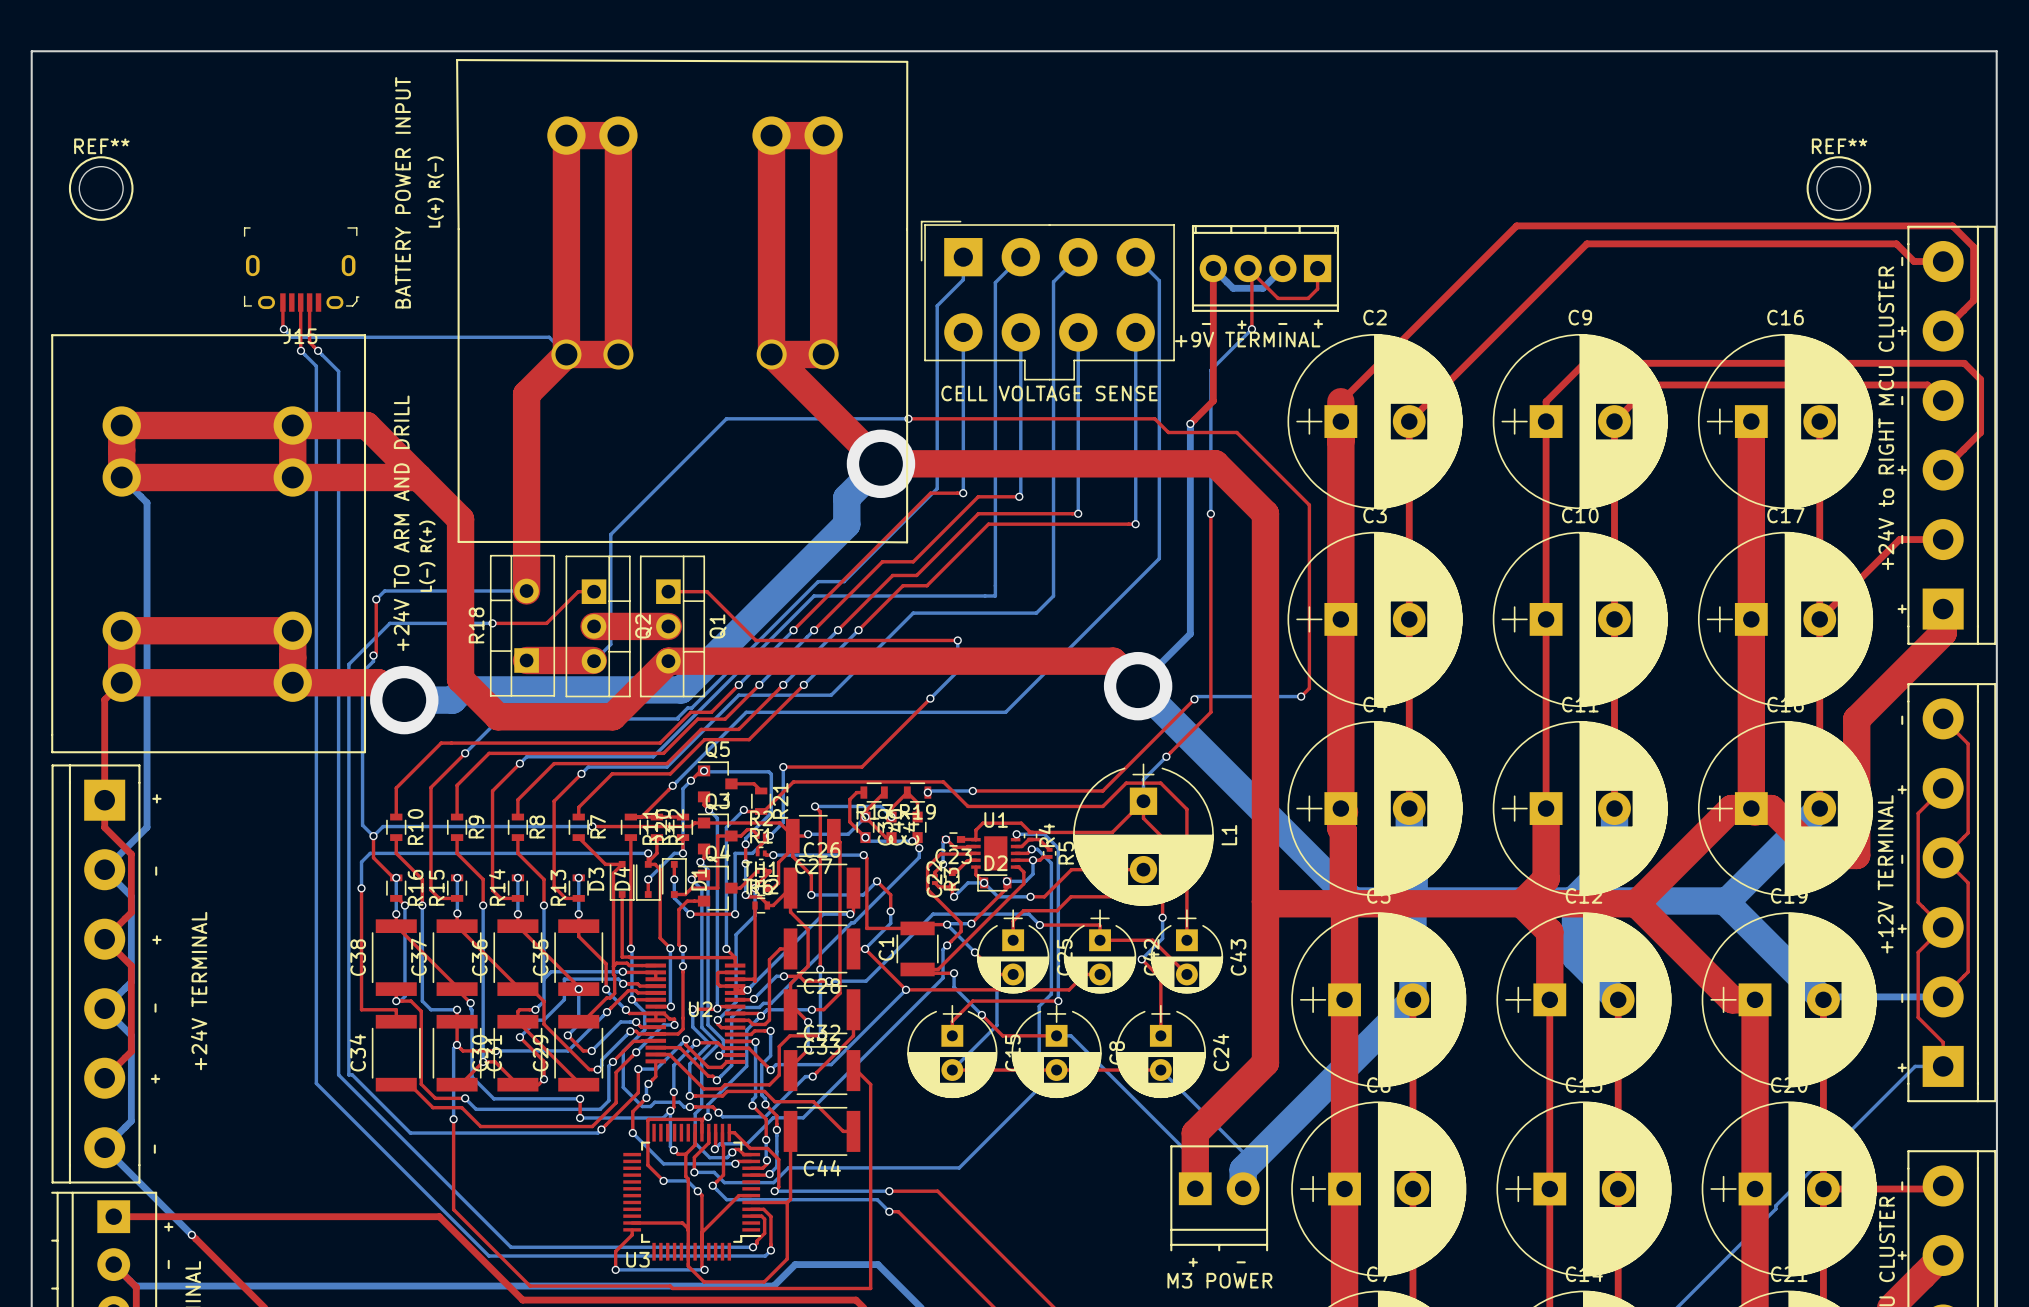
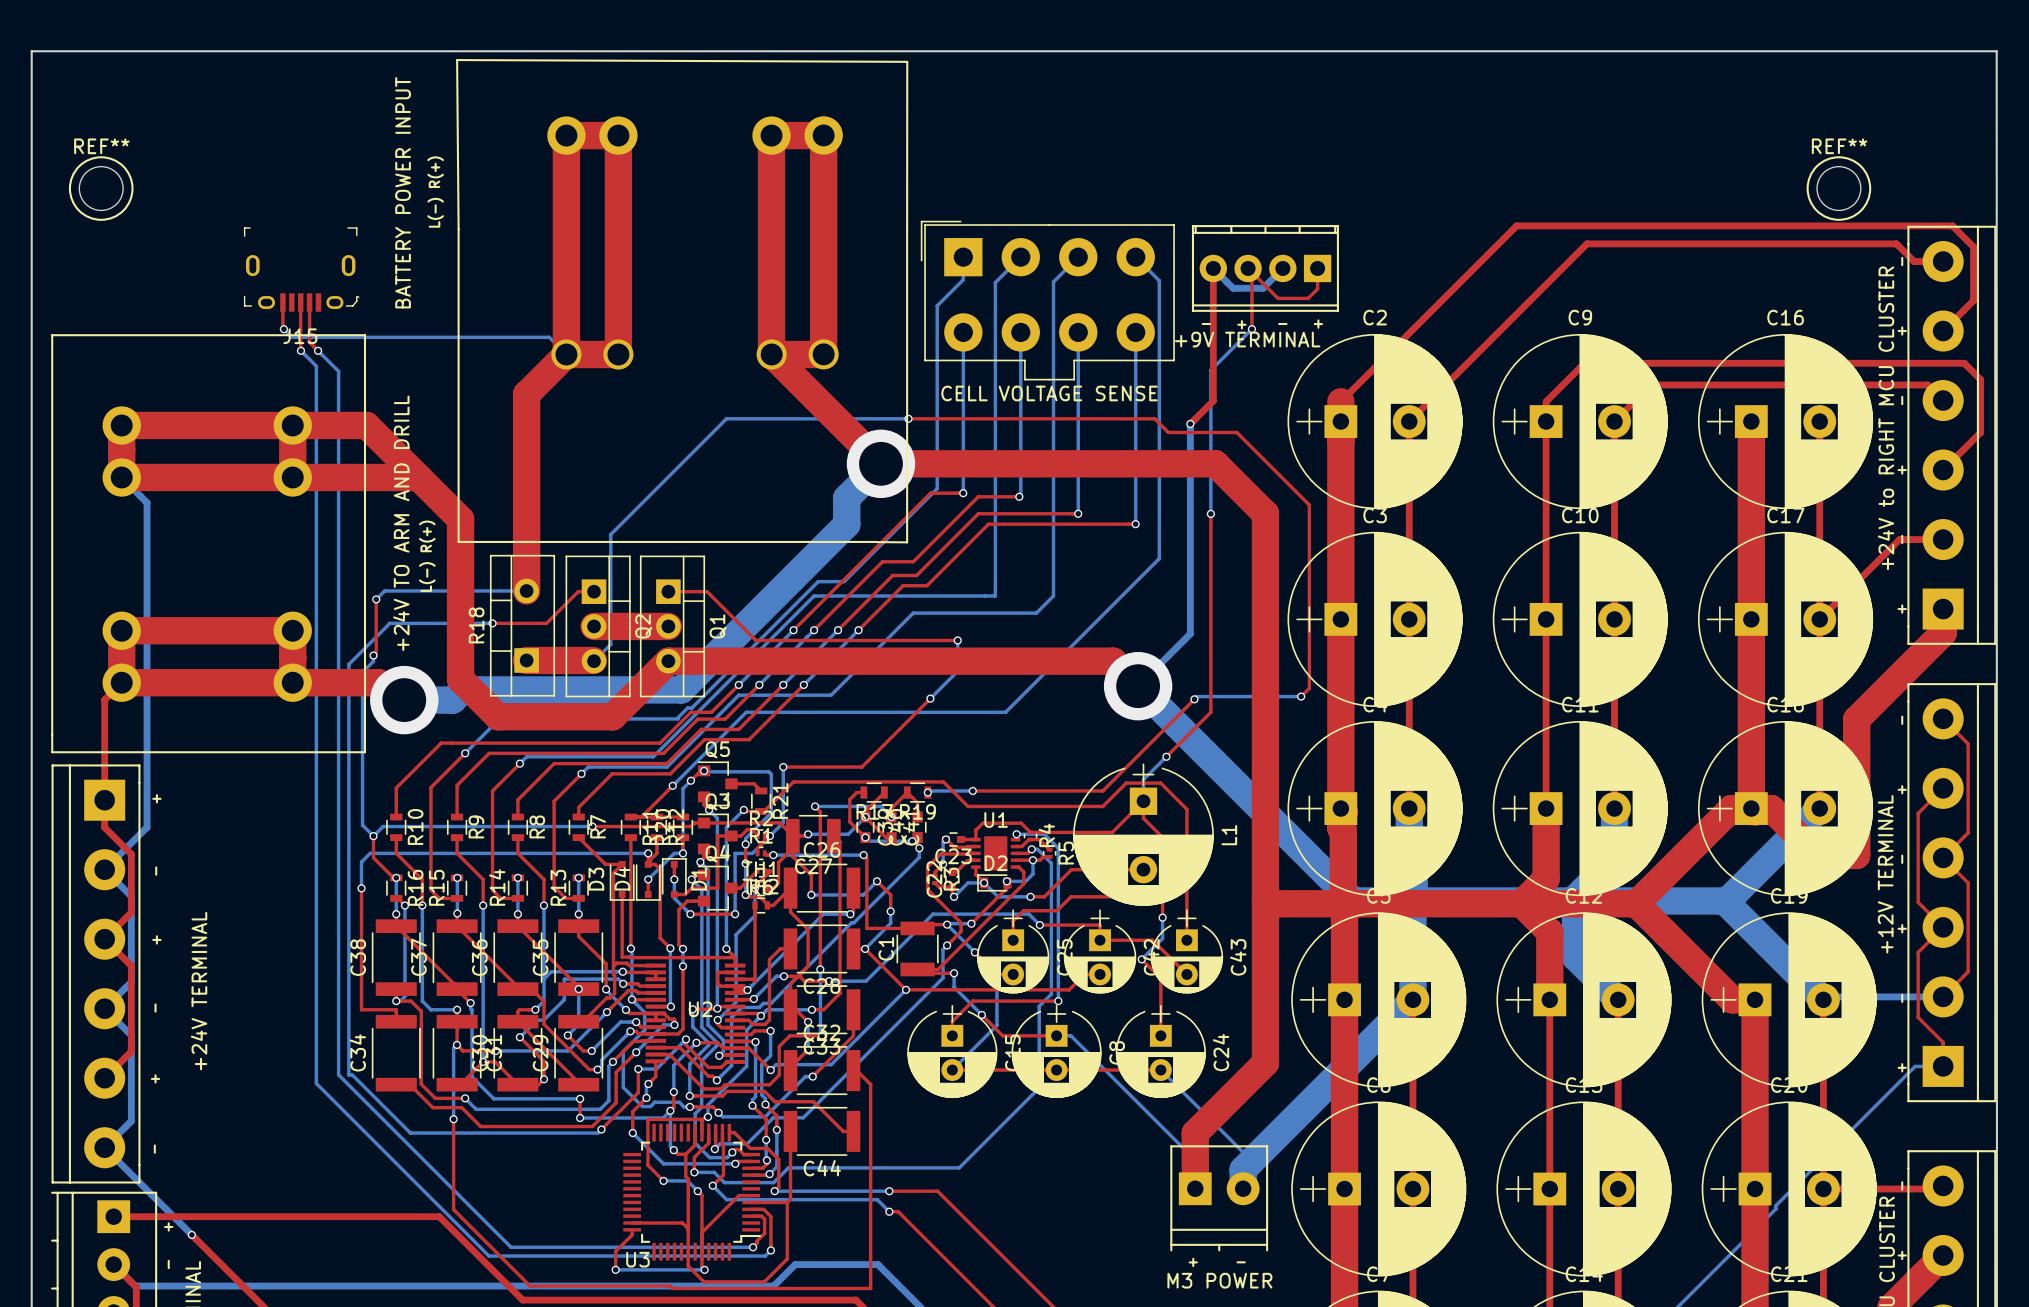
text: L(+) R(-) (435, 192) -> L(-) R(+) (435, 192)

